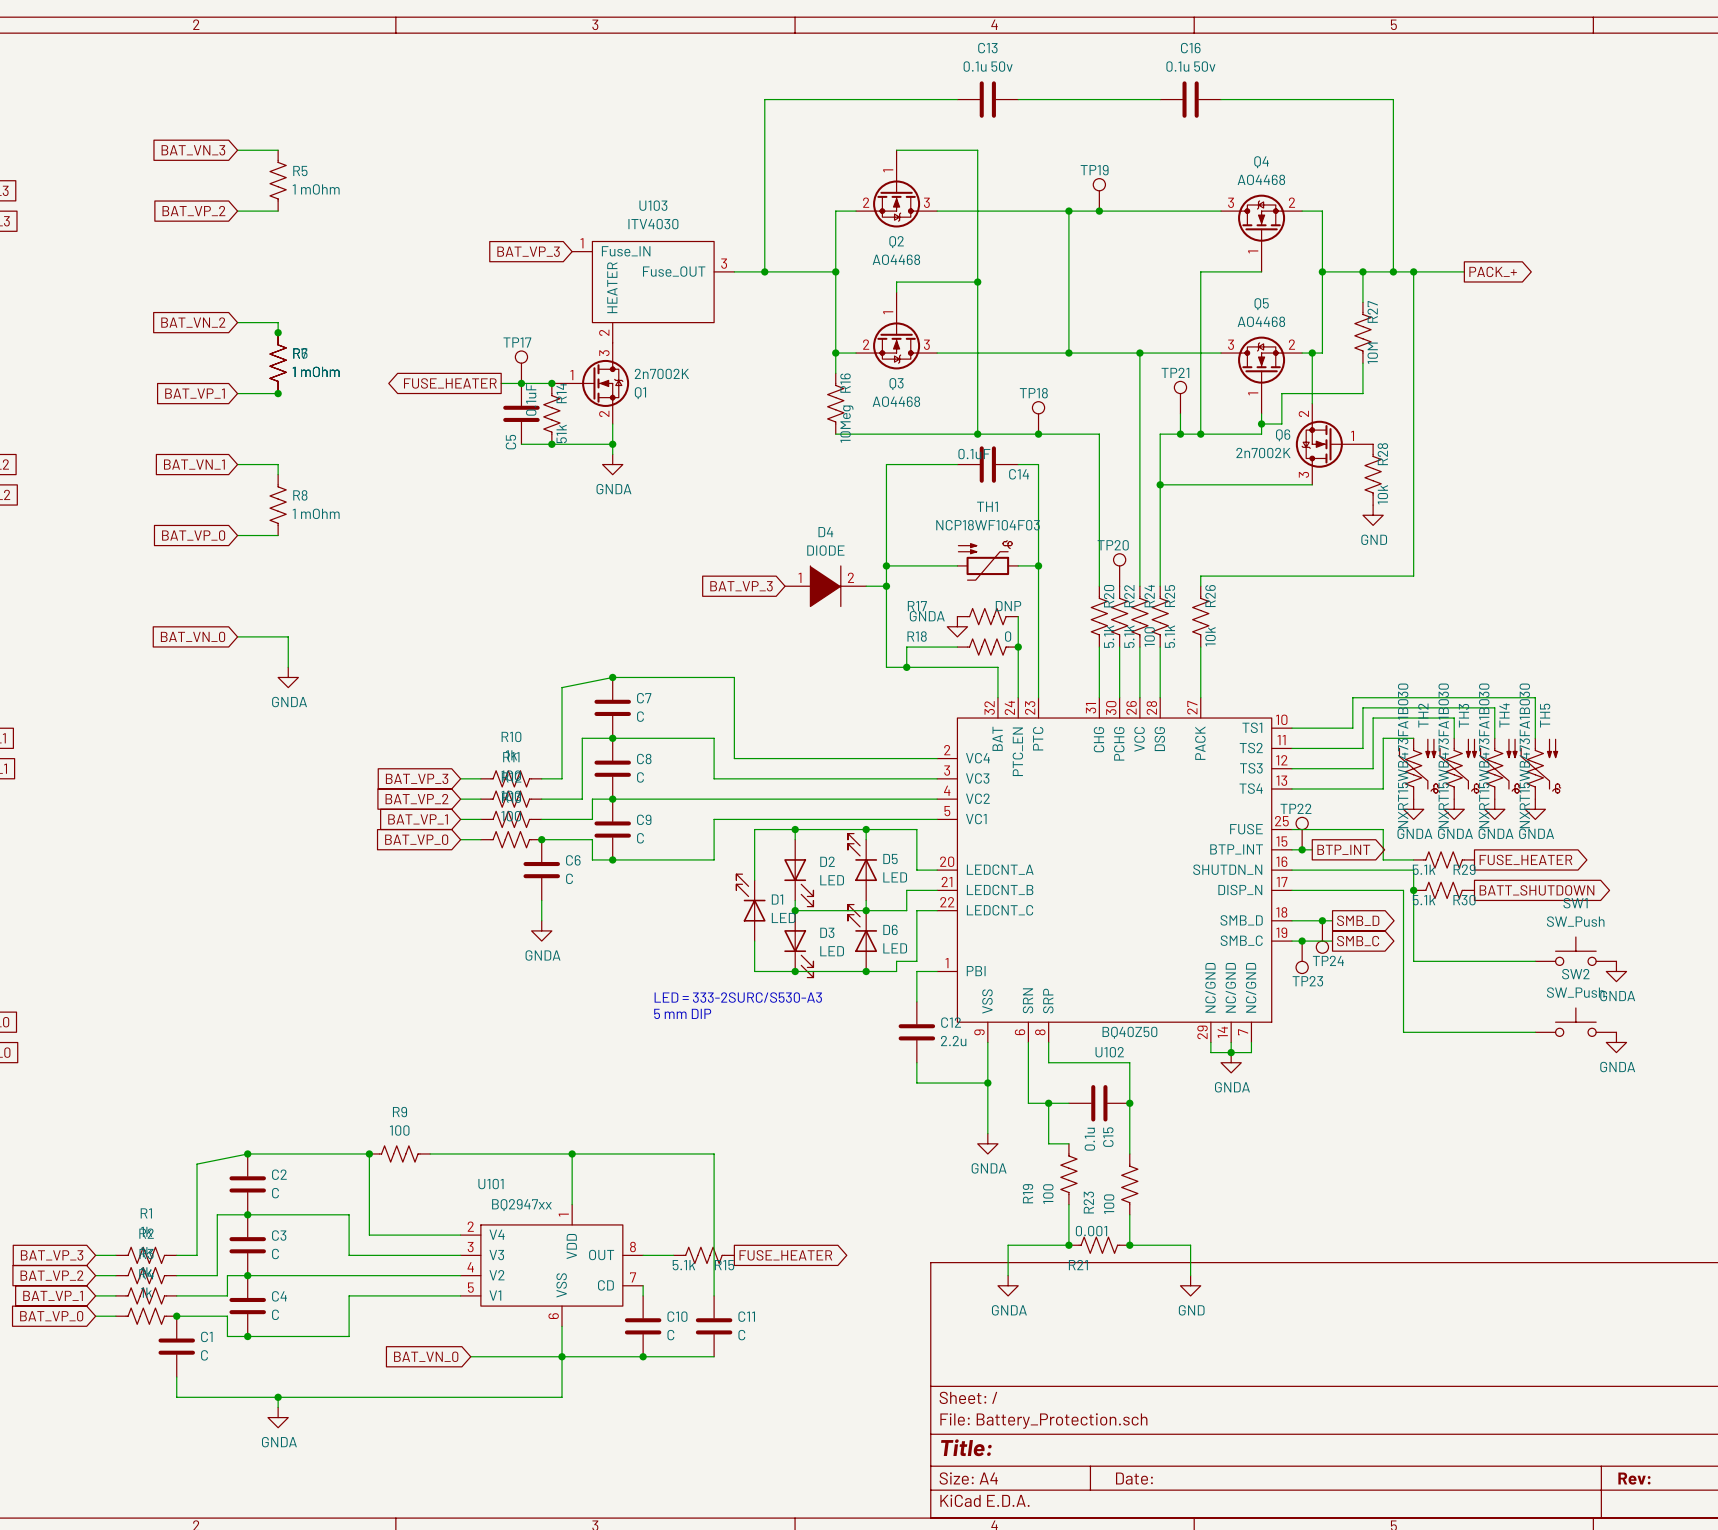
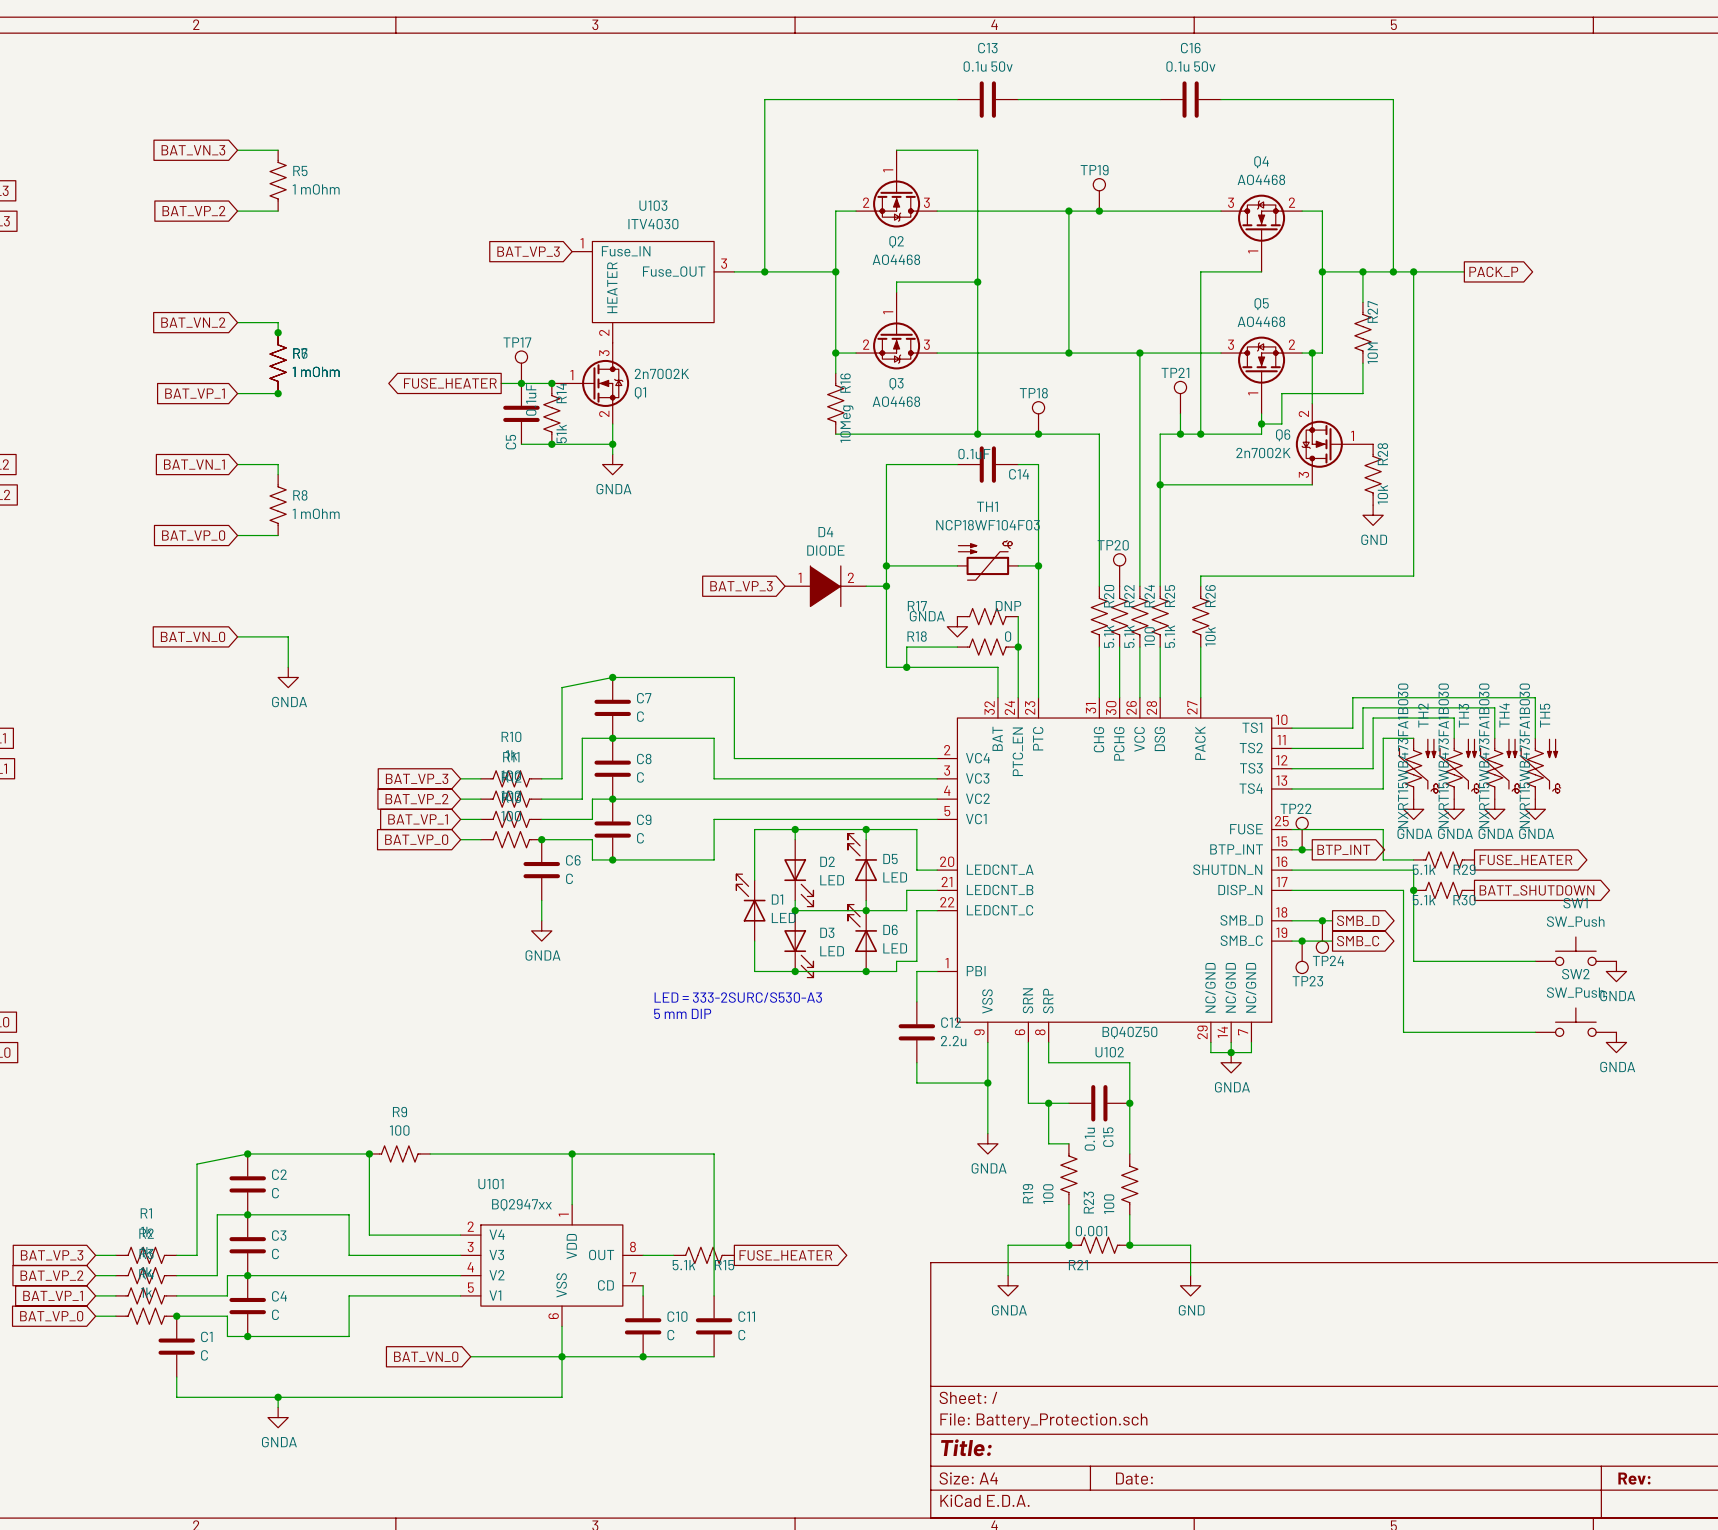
global label: PACK_+ (1493, 271) -> PACK_P (1493, 271)

